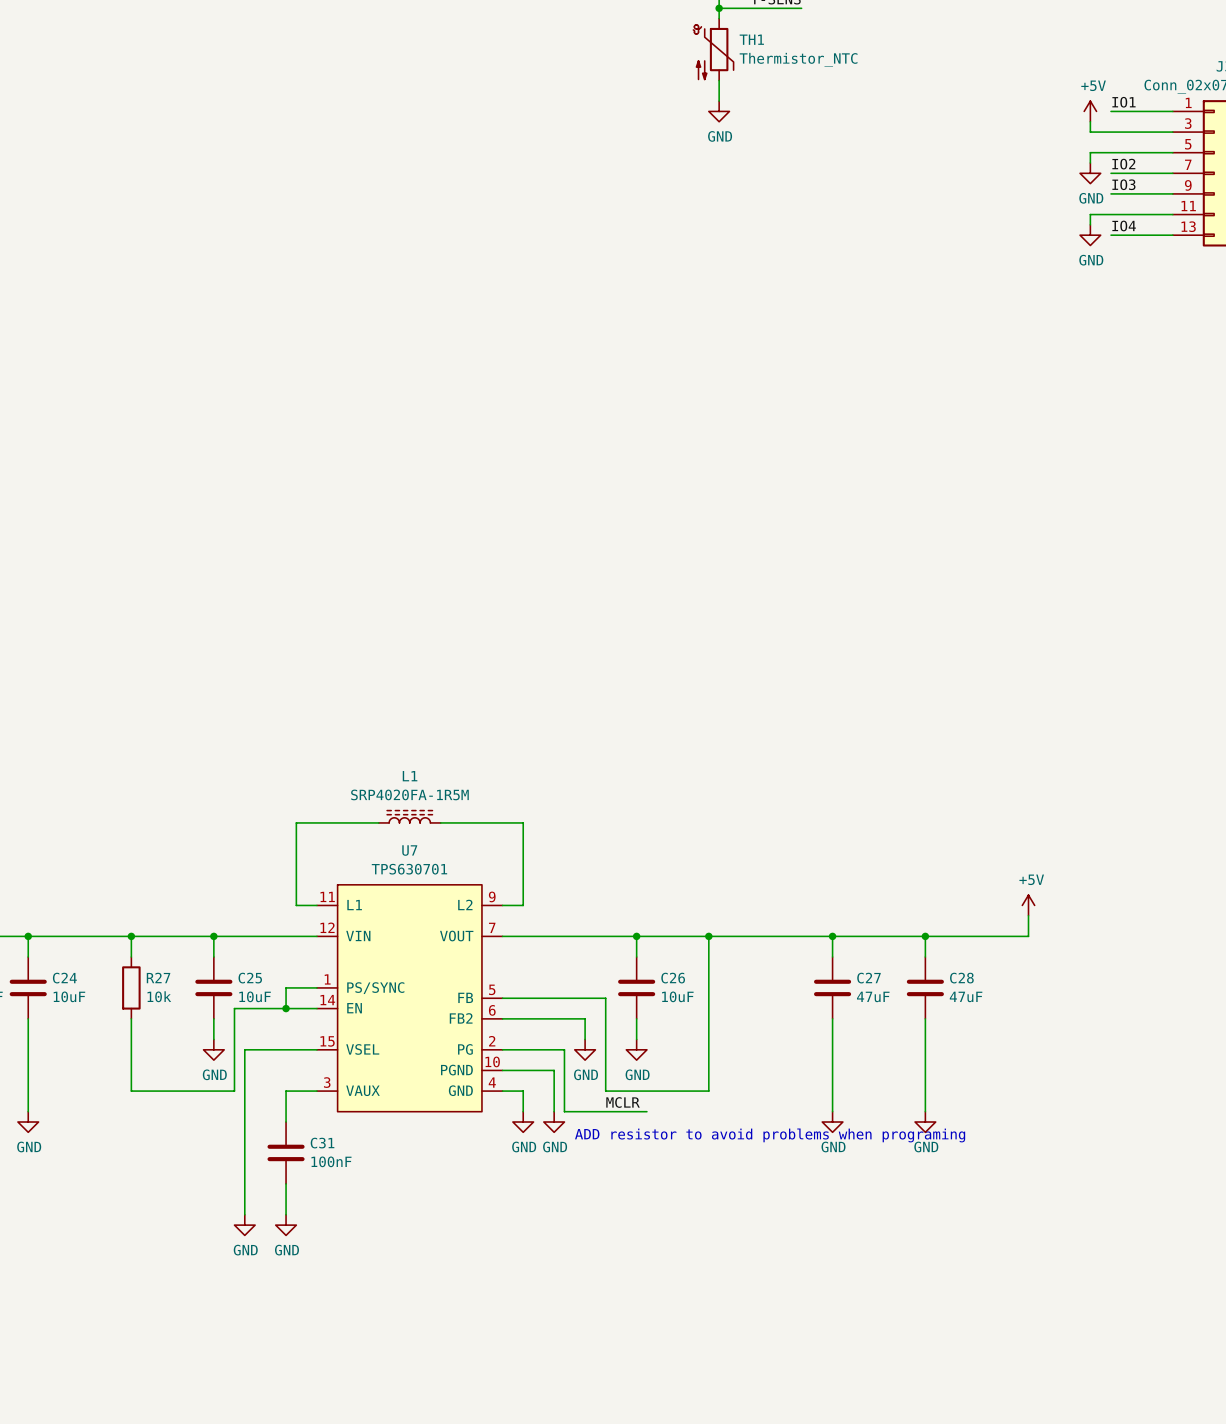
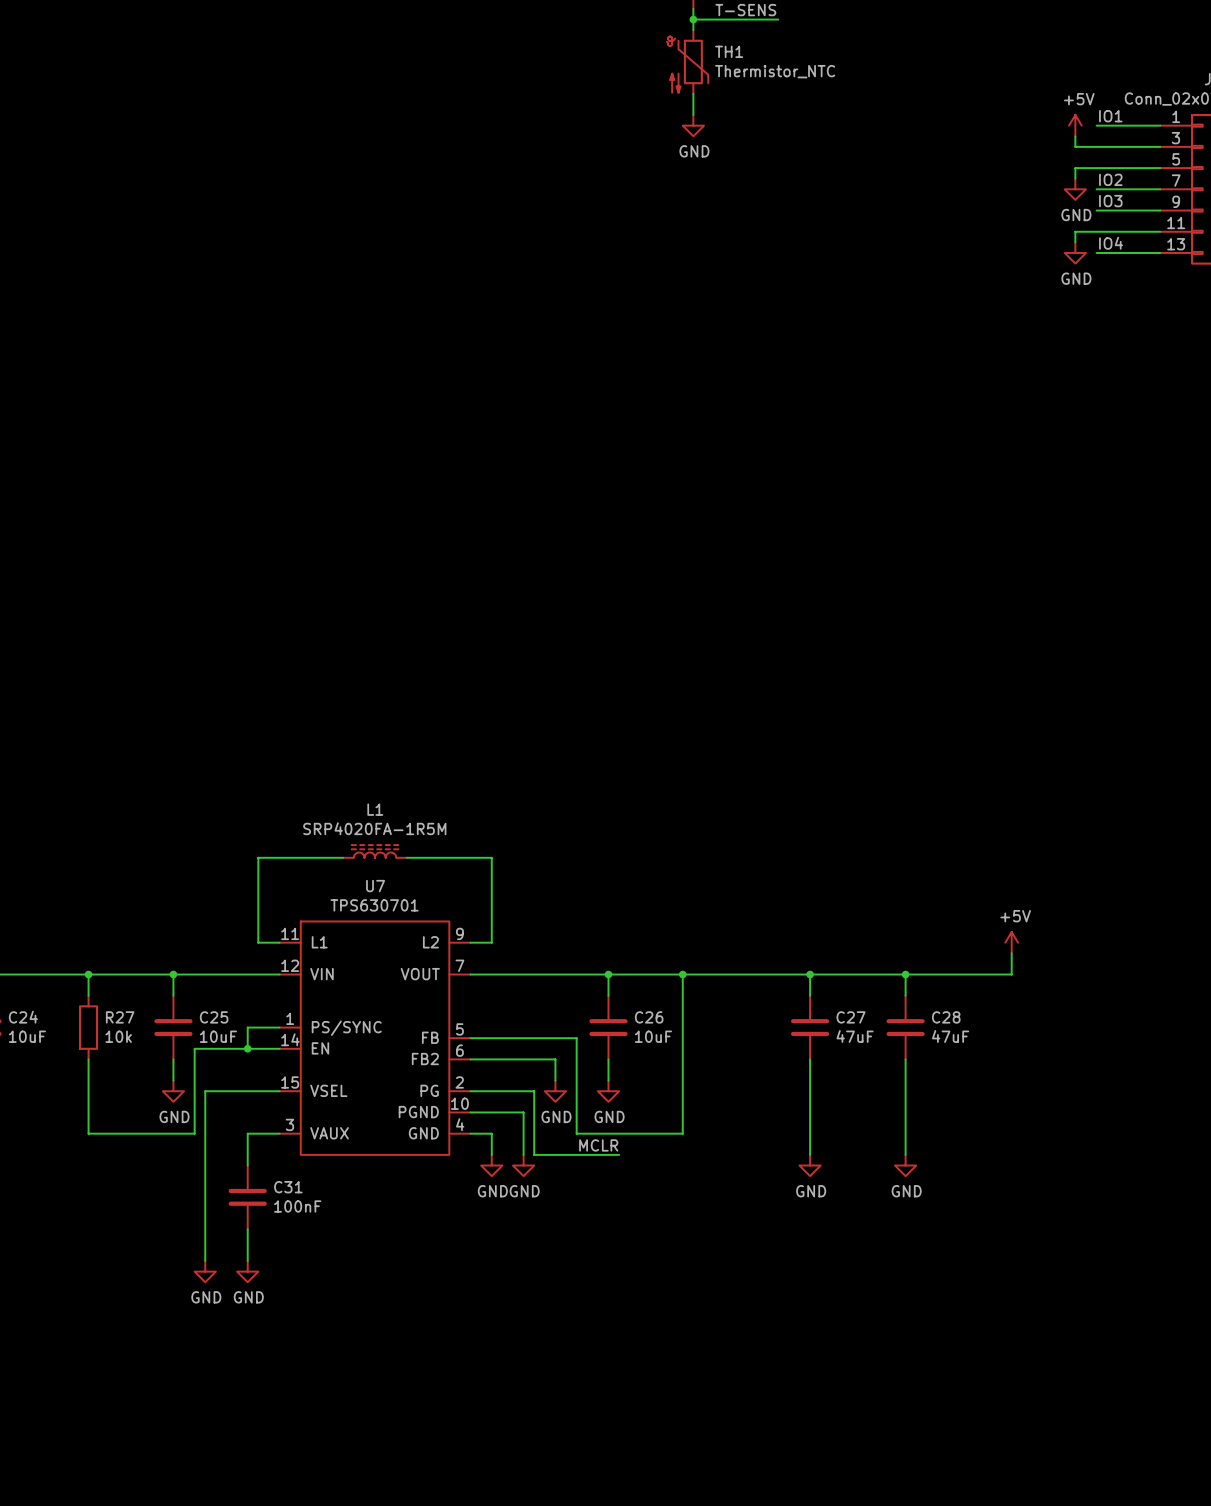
text: ADD resistor to avoid problems when programing (770, 1135) -> none

